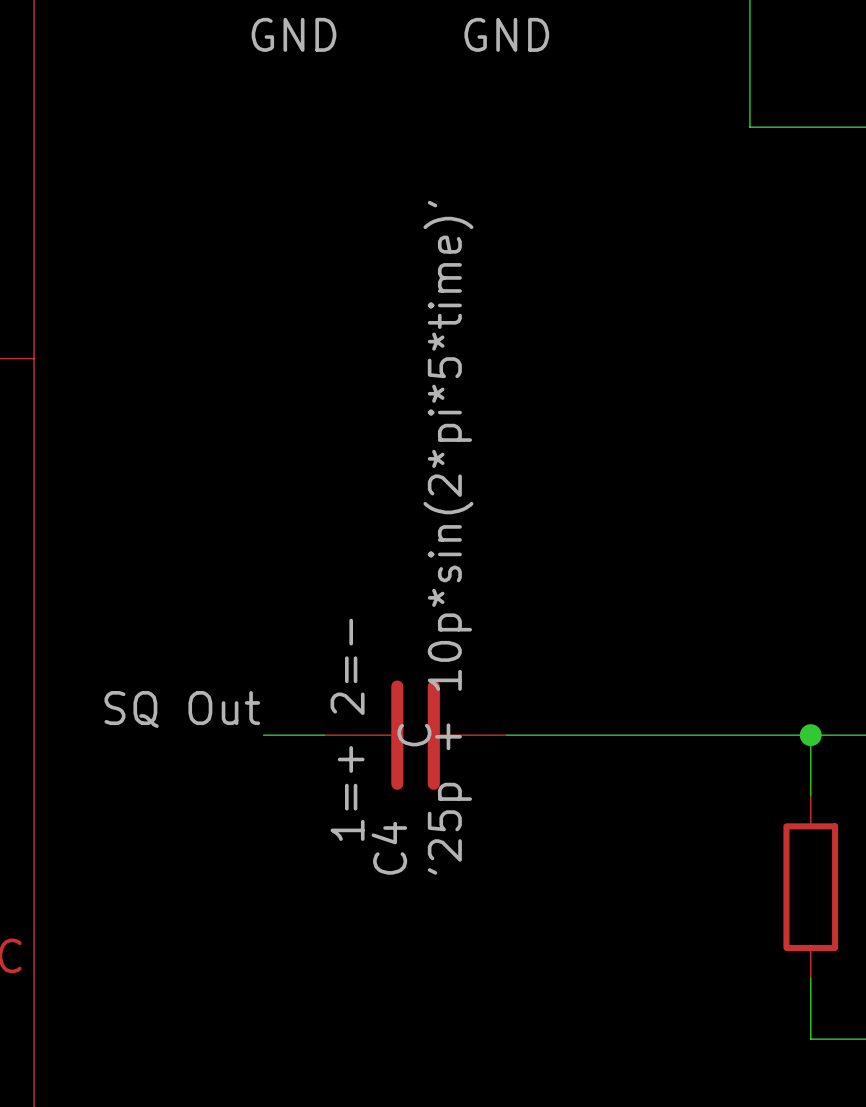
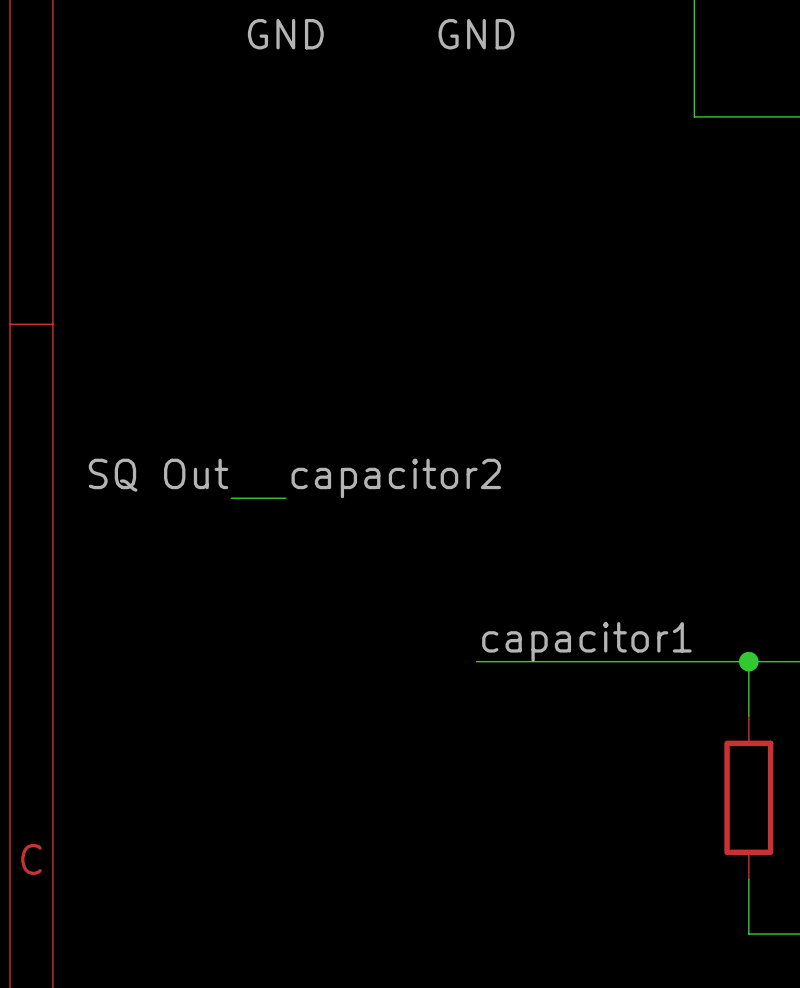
label: none -> capacitor2 (396, 478)
label position: SQ Out (182, 709) -> SQ Out (158, 475)
label: none -> capacitor1 (586, 641)
wire: (263, 735) (324, 735) -> (231, 498) (285, 498)
C4: '25p + 10p*sin(2*pi*5*time)' (415, 735) -> none

